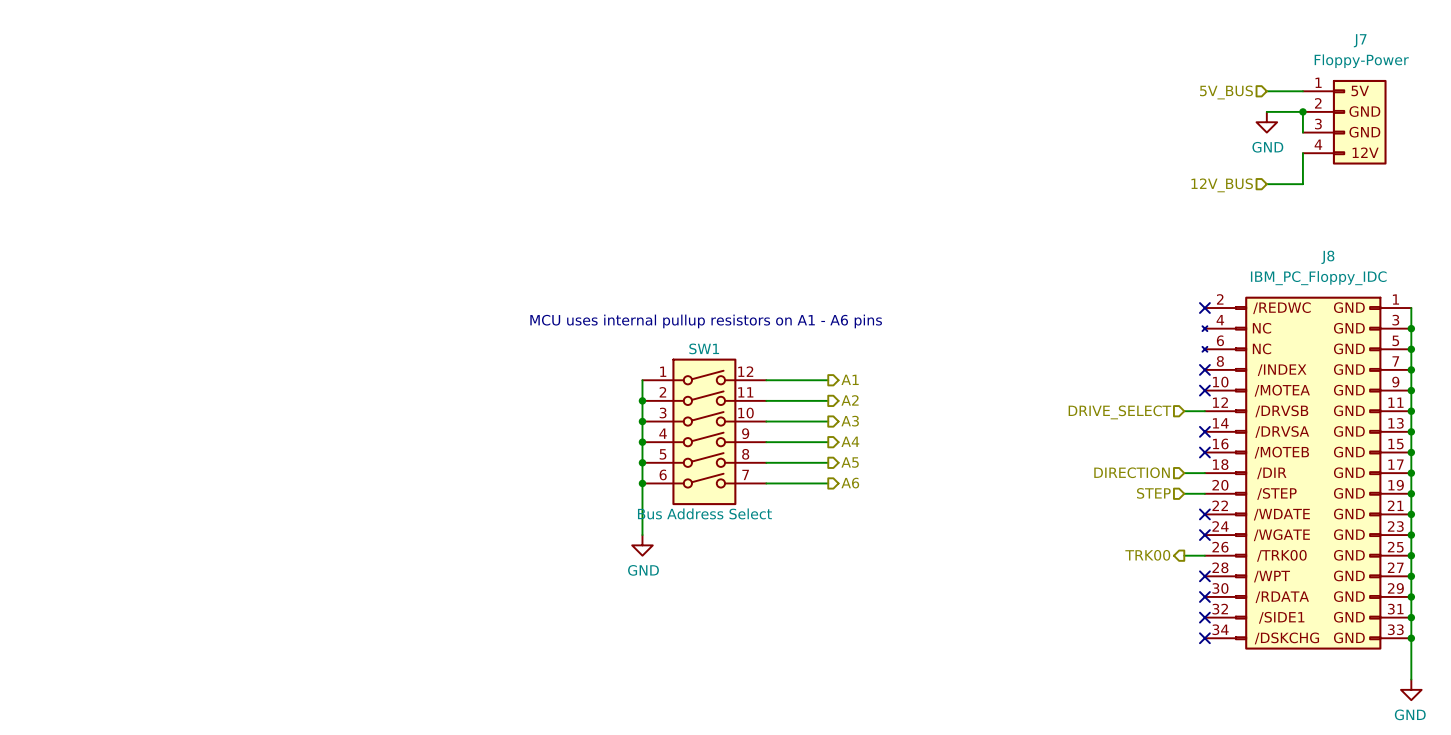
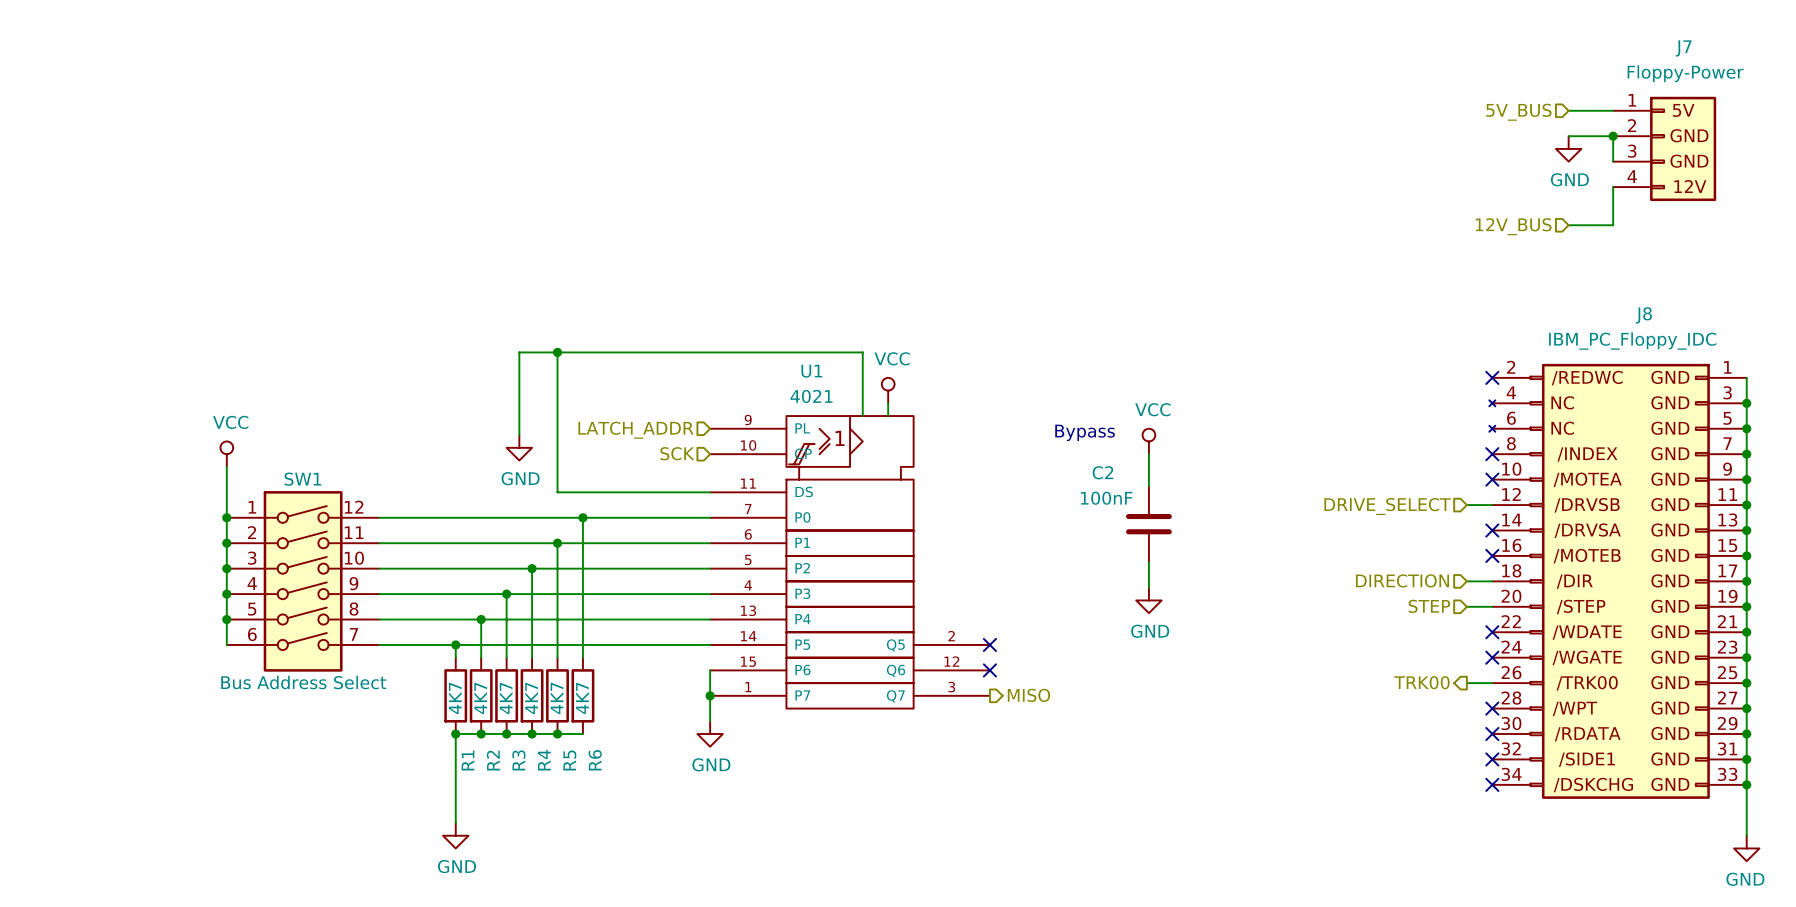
wire: none -> (557, 352) (557, 492) (710, 492)
junction: none -> (557, 352)
power symbol: none -> VCC (888, 390)
text: MCU uses internal pullup resistors on A1 - A6 pins (706, 321) -> none
wire: none -> (888, 403) (888, 416)
wire: none -> (862, 416) (862, 352) (519, 352) (519, 435)
hierarchical label: none -> LATCH_ADDR (635, 430)
text: none -> Bypass (1085, 432)
power symbol: none -> VCC (1148, 441)
power symbol: none -> GND (519, 447)
power symbol: none -> VCC (226, 454)
hierarchical label: none -> SCK (677, 453)
wire: none -> (1148, 454) (1148, 485)
hierarchical label: A1 (850, 379) -> none
wire: none -> (226, 466) (226, 644)
wire: (642, 380) (642, 535) -> none
wire: (766, 380) (828, 380) -> none
junction: (642, 400) -> none
wire: (766, 400) (828, 400) -> none
hierarchical label: A2 (850, 400) -> none
junction: none -> (226, 517)
wire: none -> (379, 517) (710, 517)
wire: none -> (582, 517) (582, 657)
junction: none -> (582, 517)
junction: (642, 421) -> none
wire: (766, 421) (828, 421) -> none
hierarchical label: A3 (850, 421) -> none
C2: none -> 100nF (1148, 524)
SW1 position: (704, 431) -> (303, 581)
hierarchical label: A4 (850, 441) -> none
junction: none -> (226, 543)
wire: none -> (379, 543) (710, 543)
wire: none -> (557, 543) (557, 657)
junction: none -> (557, 543)
junction: (642, 442) -> none
wire: (766, 442) (828, 442) -> none
U1: none -> 4021 (850, 562)
wire: none -> (1148, 562) (1148, 587)
junction: none -> (226, 568)
wire: none -> (379, 568) (710, 568)
wire: none -> (532, 568) (532, 657)
junction: none -> (532, 568)
junction: (642, 462) -> none
wire: (766, 462) (828, 462) -> none
hierarchical label: A5 (850, 462) -> none
junction: none -> (226, 594)
wire: none -> (379, 594) (710, 594)
wire: none -> (506, 594) (506, 657)
junction: none -> (506, 594)
junction: (642, 483) -> none
wire: (766, 483) (828, 483) -> none
hierarchical label: A6 (850, 483) -> none
power symbol: none -> GND (1148, 600)
junction: none -> (226, 619)
wire: none -> (379, 619) (710, 619)
wire: none -> (481, 619) (481, 657)
junction: none -> (481, 619)
wire: none -> (379, 644) (710, 644)
wire: none -> (455, 644) (455, 657)
junction: none -> (455, 644)
no-connect mark: none -> (989, 644)
wire: none -> (710, 670) (710, 721)
power symbol position: GND (642, 545) -> GND (710, 734)
no-connect mark: none -> (989, 670)
hierarchical label: none -> MISO (1028, 695)
R1: none -> 4K7 (455, 695)
R2: none -> 4K7 (481, 695)
R3: none -> 4K7 (506, 695)
R4: none -> 4K7 (532, 695)
R5: none -> 4K7 (557, 695)
R6: none -> 4K7 (582, 695)
junction: none -> (710, 695)
junction: none -> (455, 734)
junction: none -> (481, 734)
junction: none -> (506, 734)
junction: none -> (532, 734)
junction: none -> (557, 734)
wire: none -> (582, 734) (455, 734) (455, 823)
power symbol: none -> GND (455, 835)

